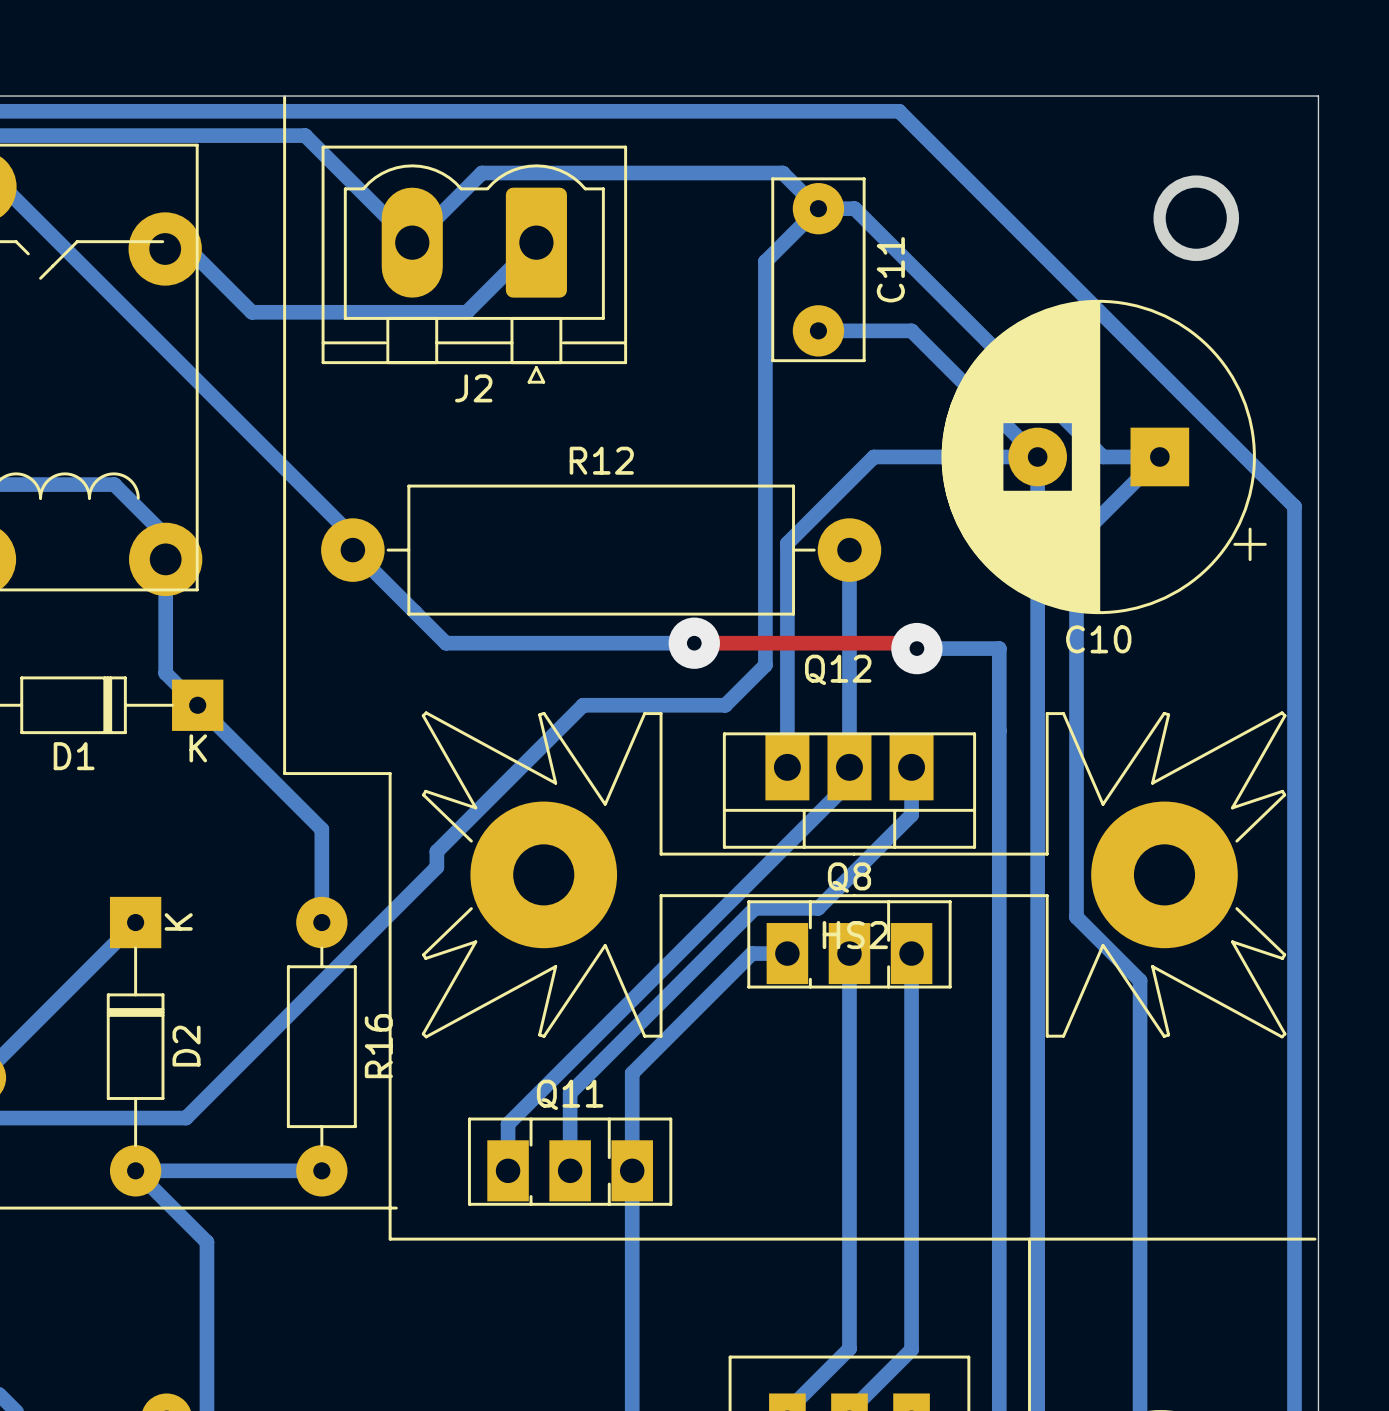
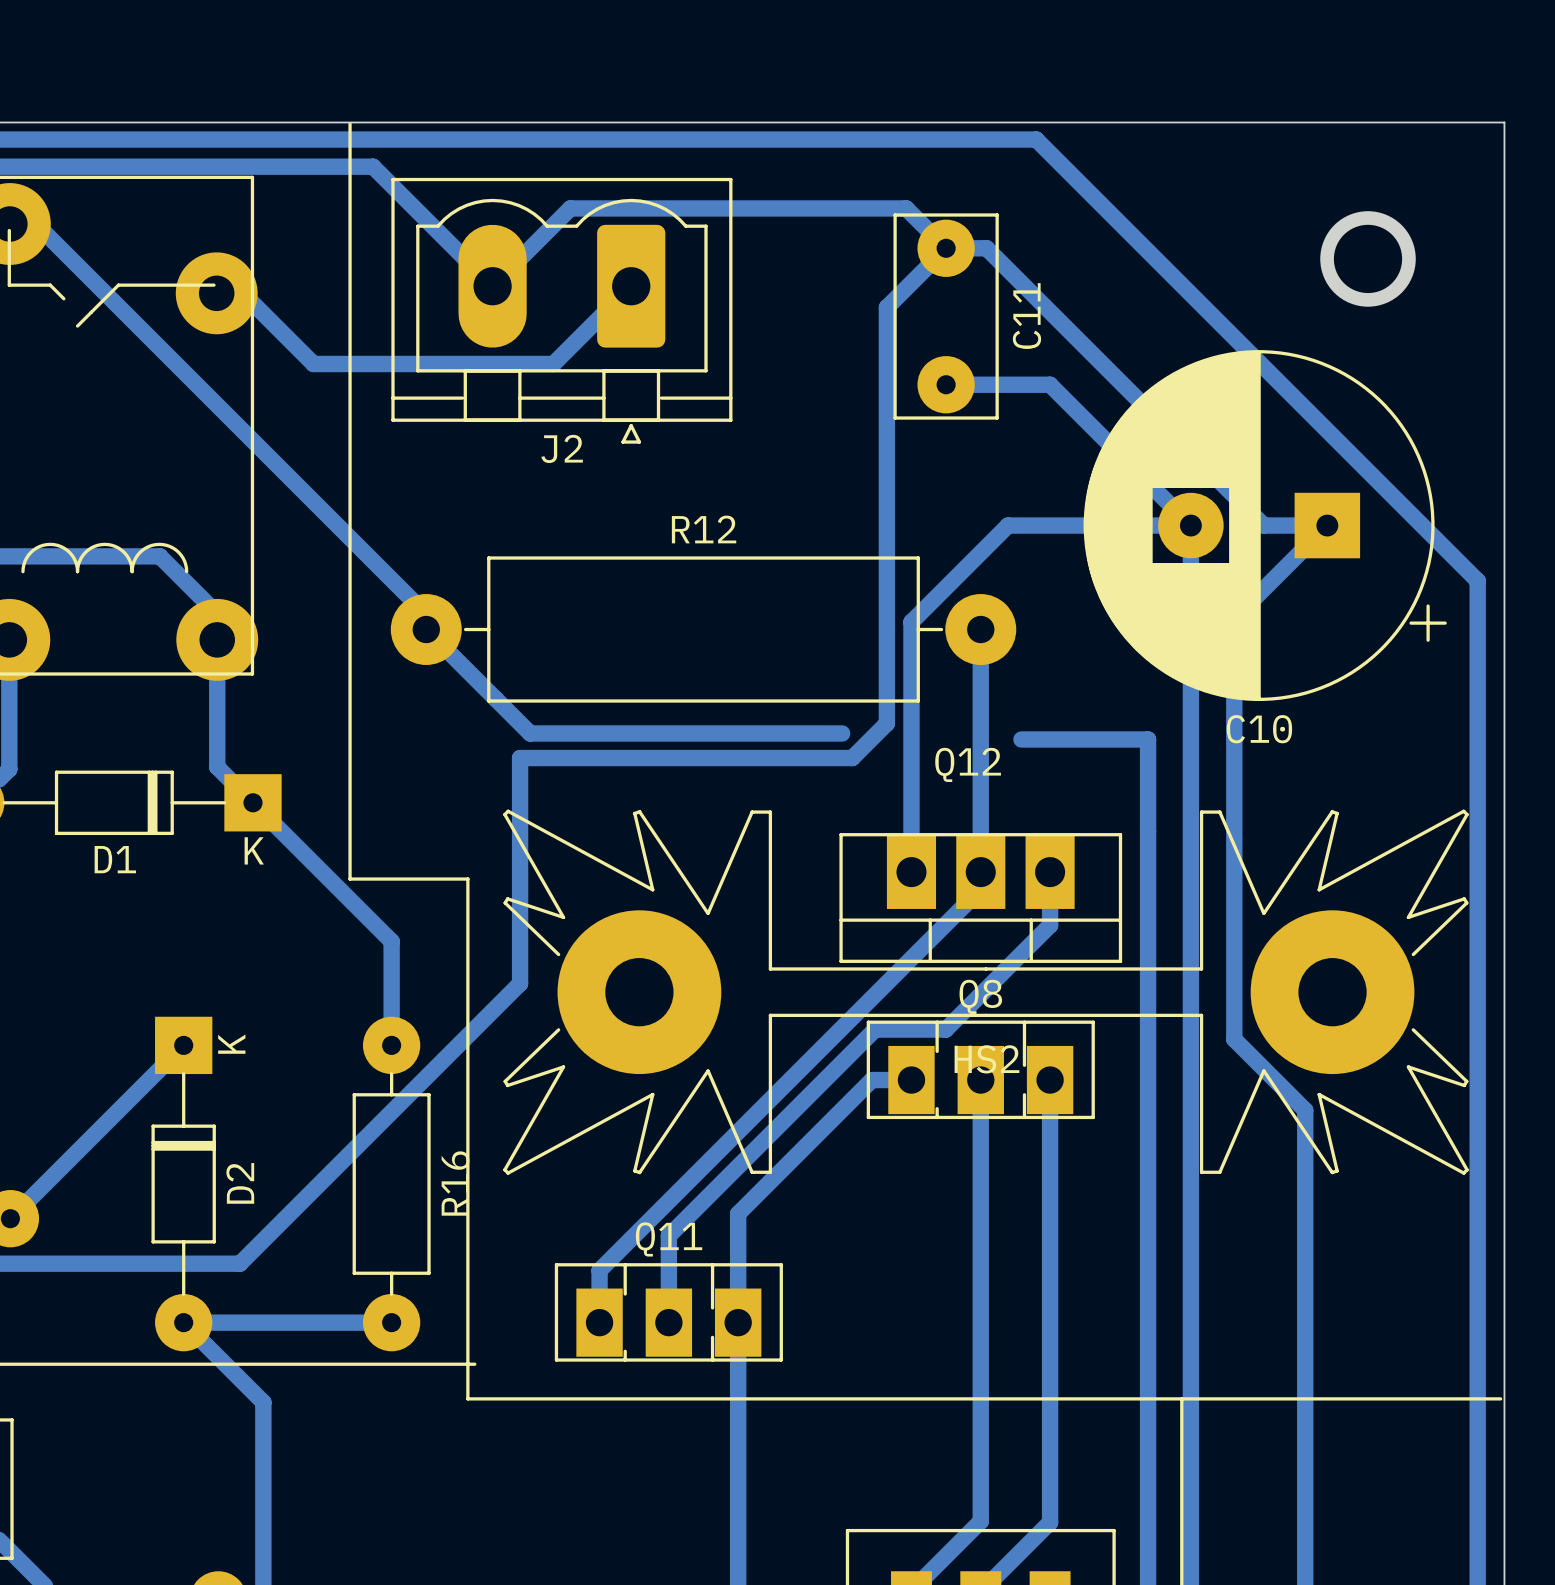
bottom track: (765, 634) (765, 665) (725, 705) (583, 705) (436, 851) -> (886, 723) (852, 758) (520, 758) (520, 966)
bottom track: none -> (807, 733) (842, 733)
top track: (694, 643) (911, 643) (916, 648) -> none
via: (694, 643) -> none
bottom track: none -> (1021, 739) (1056, 739)
via: (916, 648) -> none

